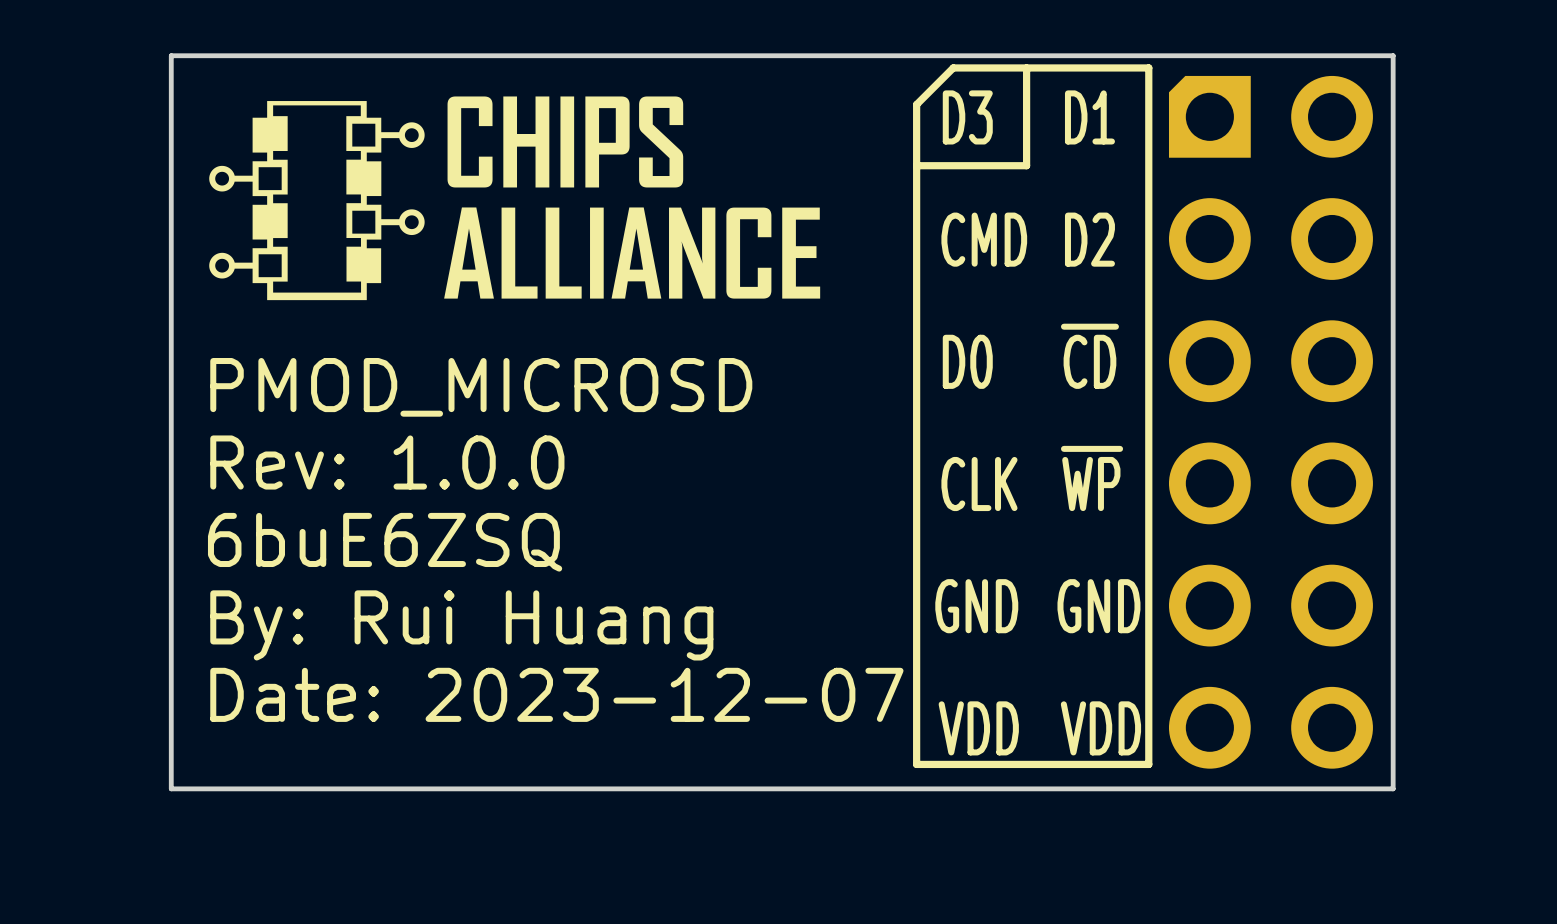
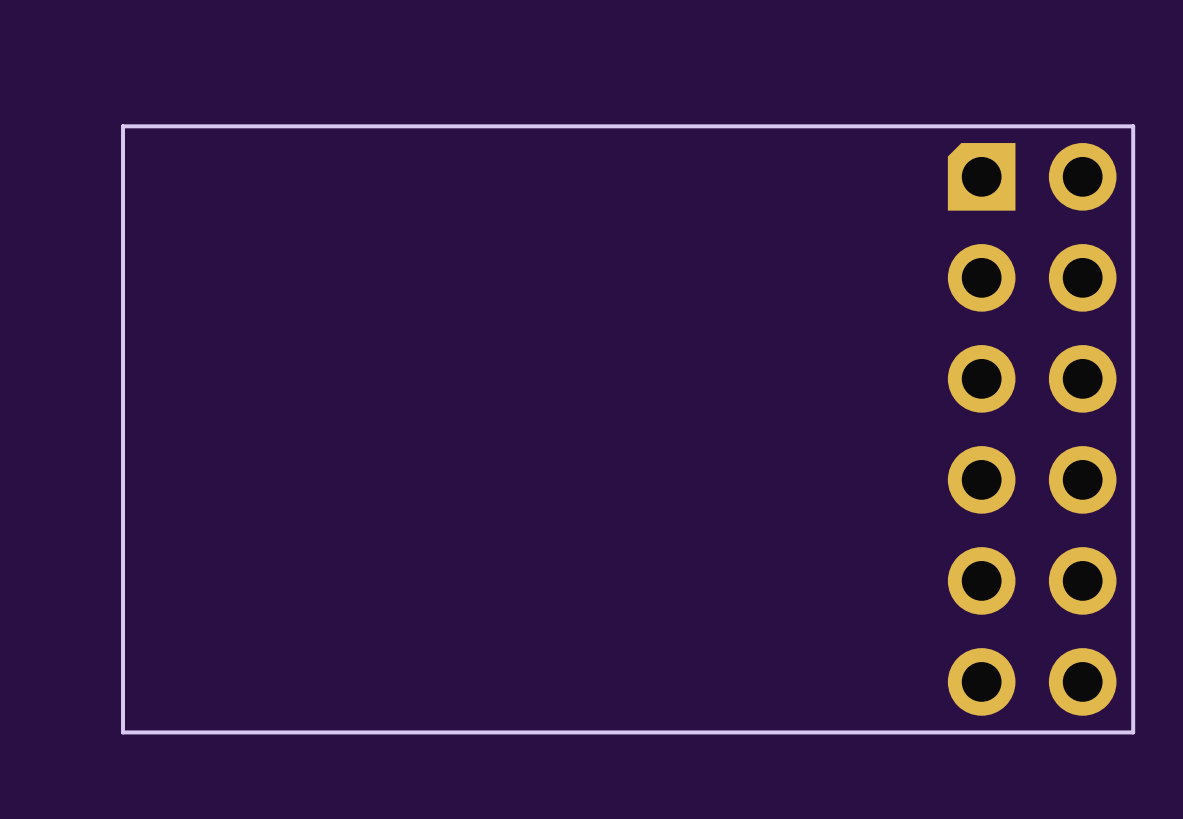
line: (1026, 67) (1026, 165) (916, 165) -> none
line: (1148, 67) (1148, 764) (916, 764) (916, 104) (953, 67) (1148, 67) -> none
drawing: [209, 96, 821, 301] -> none
text: D3 (967, 117) -> none
text: D1 (1089, 117) -> none
text: CMD (984, 239) -> none
text: D2 (1089, 239) -> none
text: ~{CD} (1089, 356) -> none
text: D0 (967, 361) -> none
text: PMOD_MICROSD (481, 387) -> none
text: Rev: 1.0.0 (387, 462) -> none
text: ~{WP} (1092, 478) -> none
text: CLK (979, 484) -> none
text: 6buE6ZSQ (385, 542) -> none
text: GND (976, 606) -> none
text: GND (1098, 606) -> none
text: By: Rui Huang (461, 625) -> none
text: Date: 2023-12-07 (556, 694) -> none
text: VDD (978, 728) -> none
text: VDD (1100, 728) -> none

